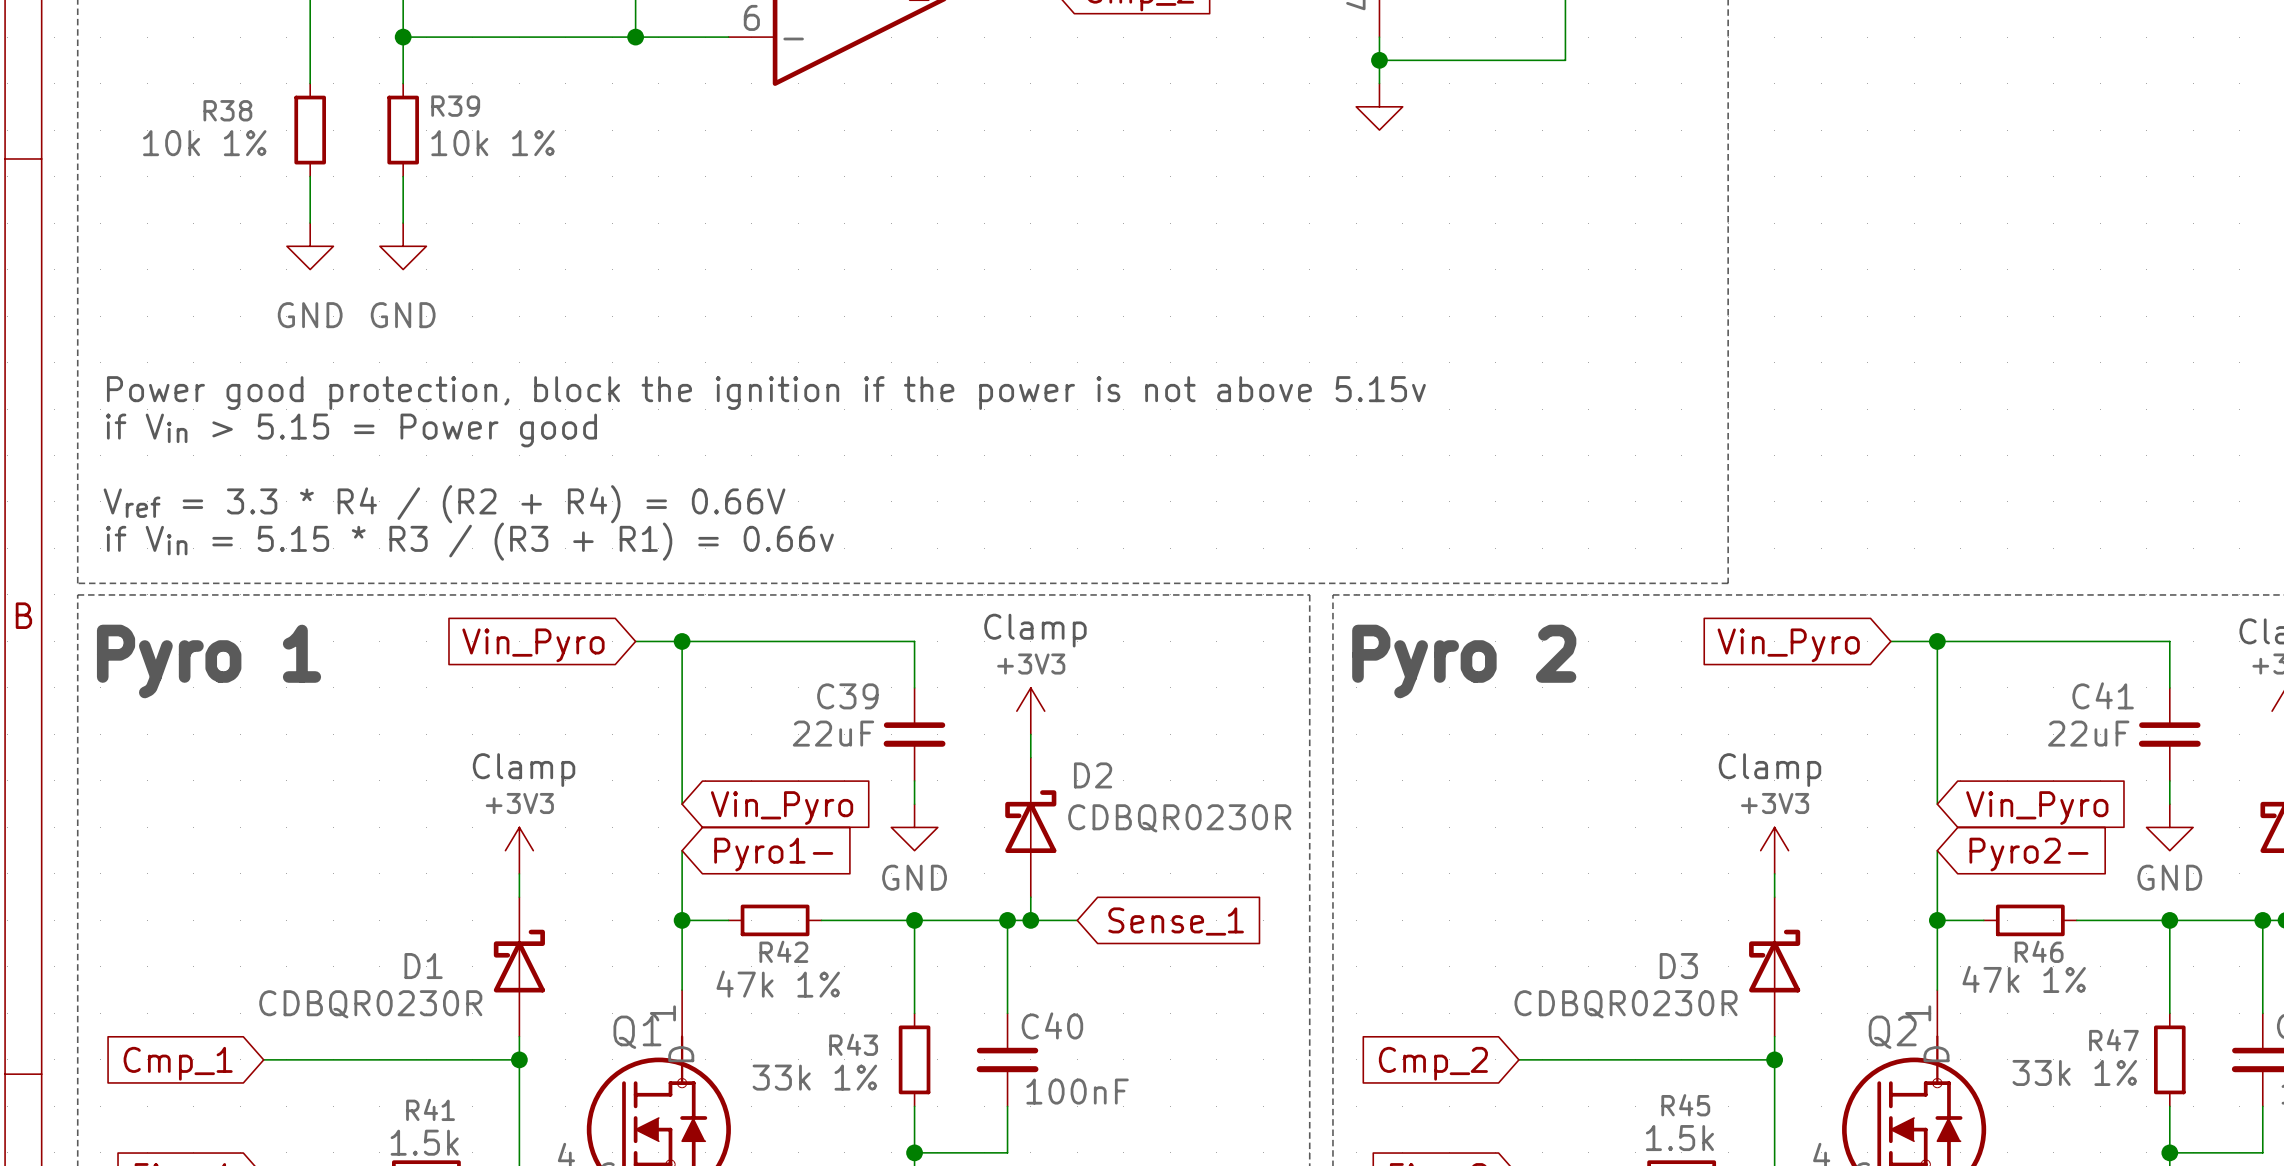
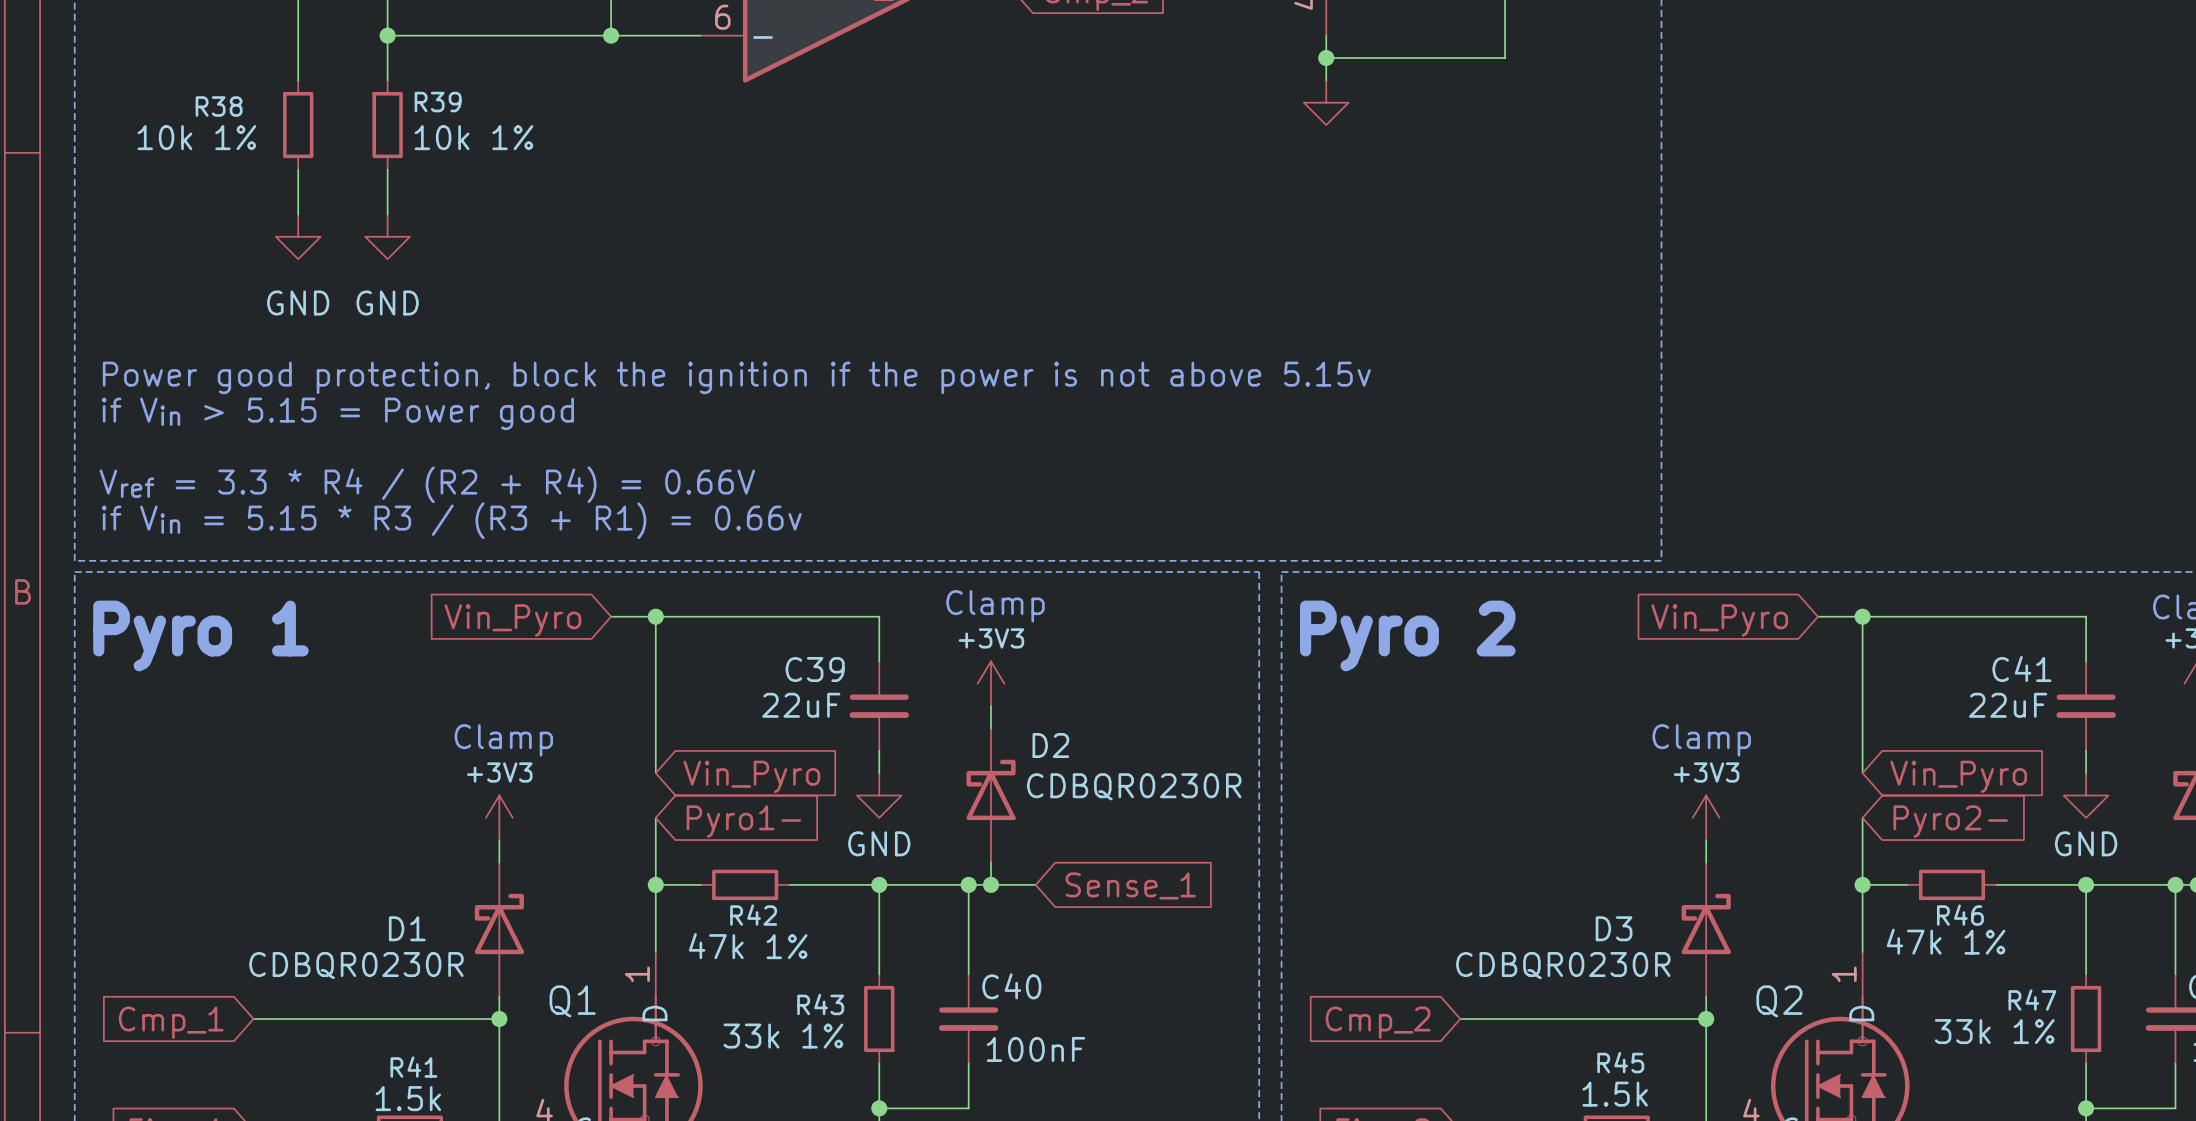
Q1 name position: Q1 (637, 1032) -> Q1 (572, 1001)
Q2 name position: Q2 (1892, 1032) -> Q2 (1779, 1001)

